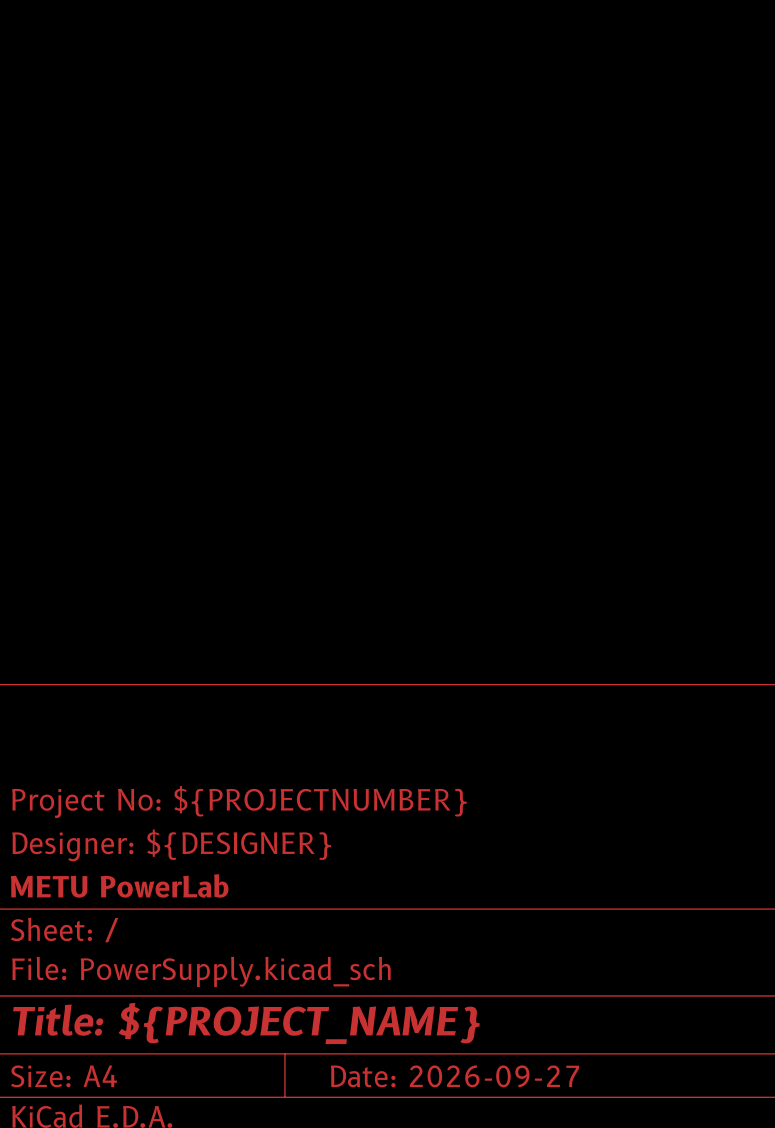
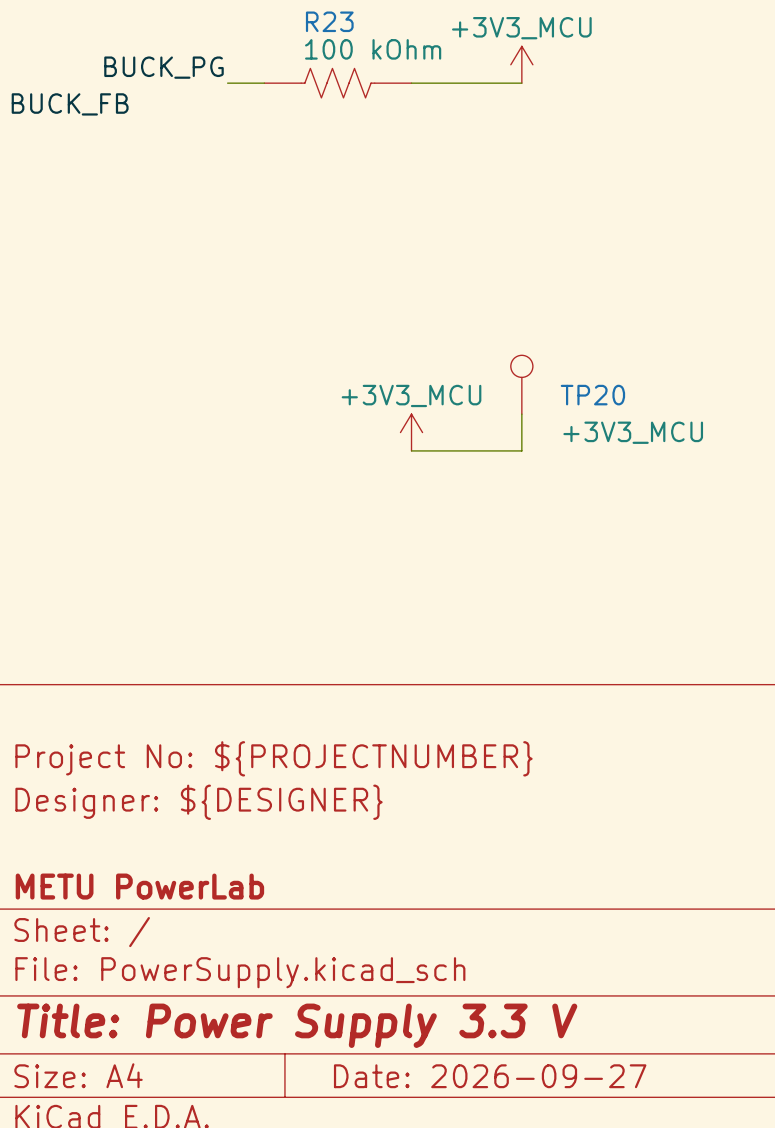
power symbol: none -> +3V3_MCU (521, 64)
label: none -> BUCK_PG (164, 67)
wire: none -> (227, 83) (264, 83)
R23: none -> 100 kOhm (337, 83)
wire: none -> (411, 83) (521, 83)
label: none -> BUCK_FB (70, 104)
TP20: none -> +3V3_MCU (521, 384)
wire: none -> (521, 414) (521, 450) (411, 450)
power symbol: none -> +3V3_MCU (411, 432)
title block: none -> Project No: ${PROJECTNUMBER} (274, 758)
title block: Project No: ${PROJECTNUMBER} (239, 801) -> Designer: ${DESIGNER} (199, 802)
title block: Designer: ${DESIGNER} (171, 845) -> none
title block: Title: ${PROJECT_NAME} (246, 1023) -> Title: Power Supply 3.3 V (297, 1025)

